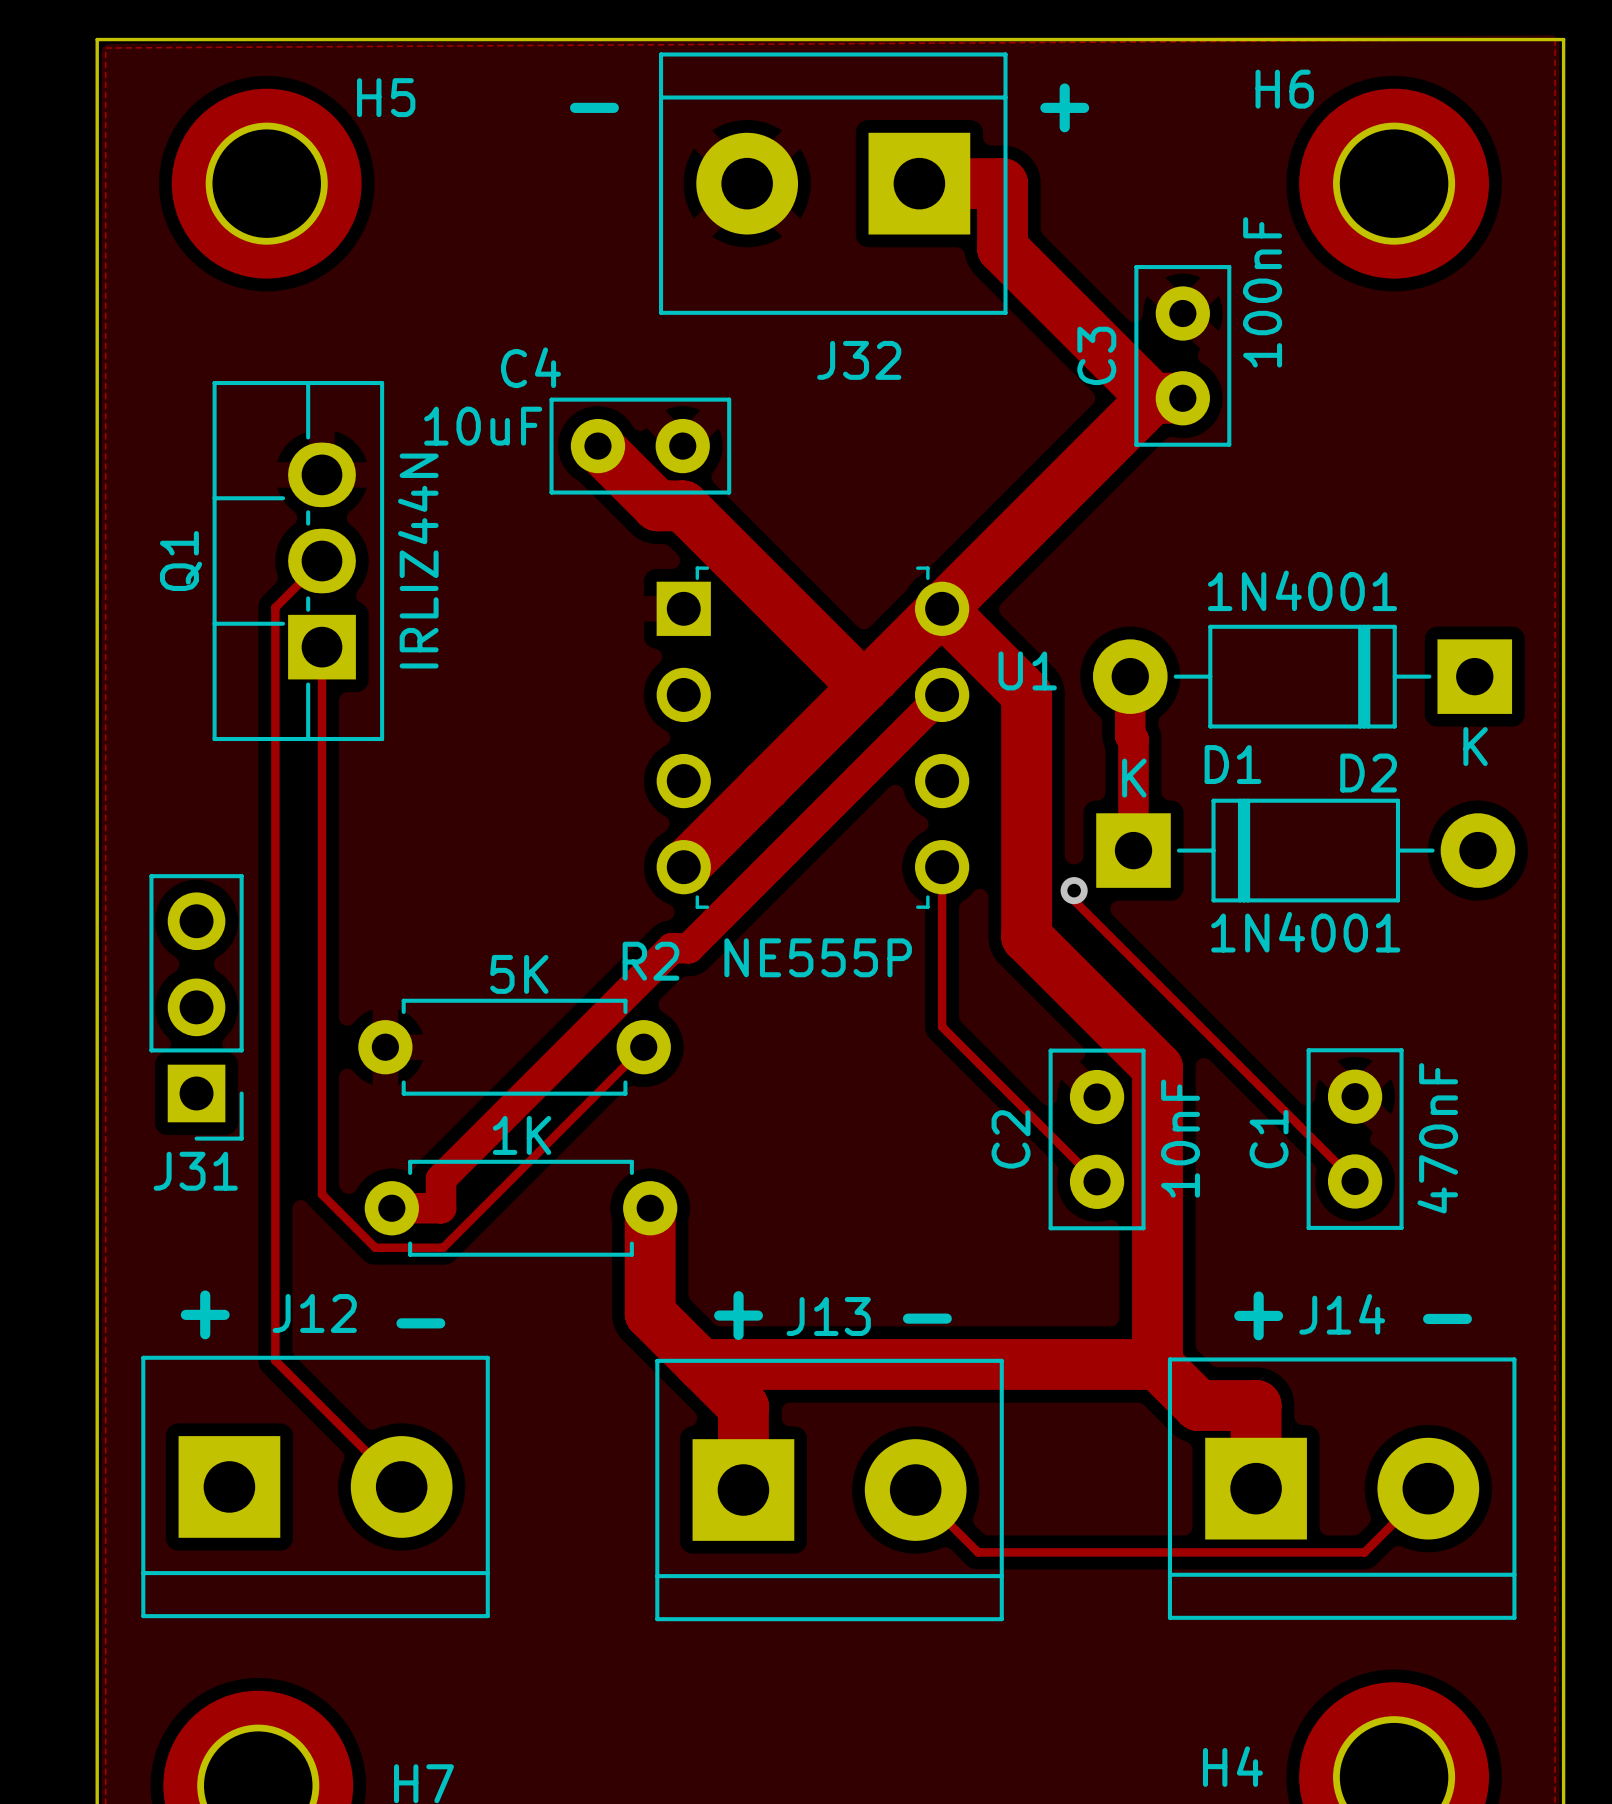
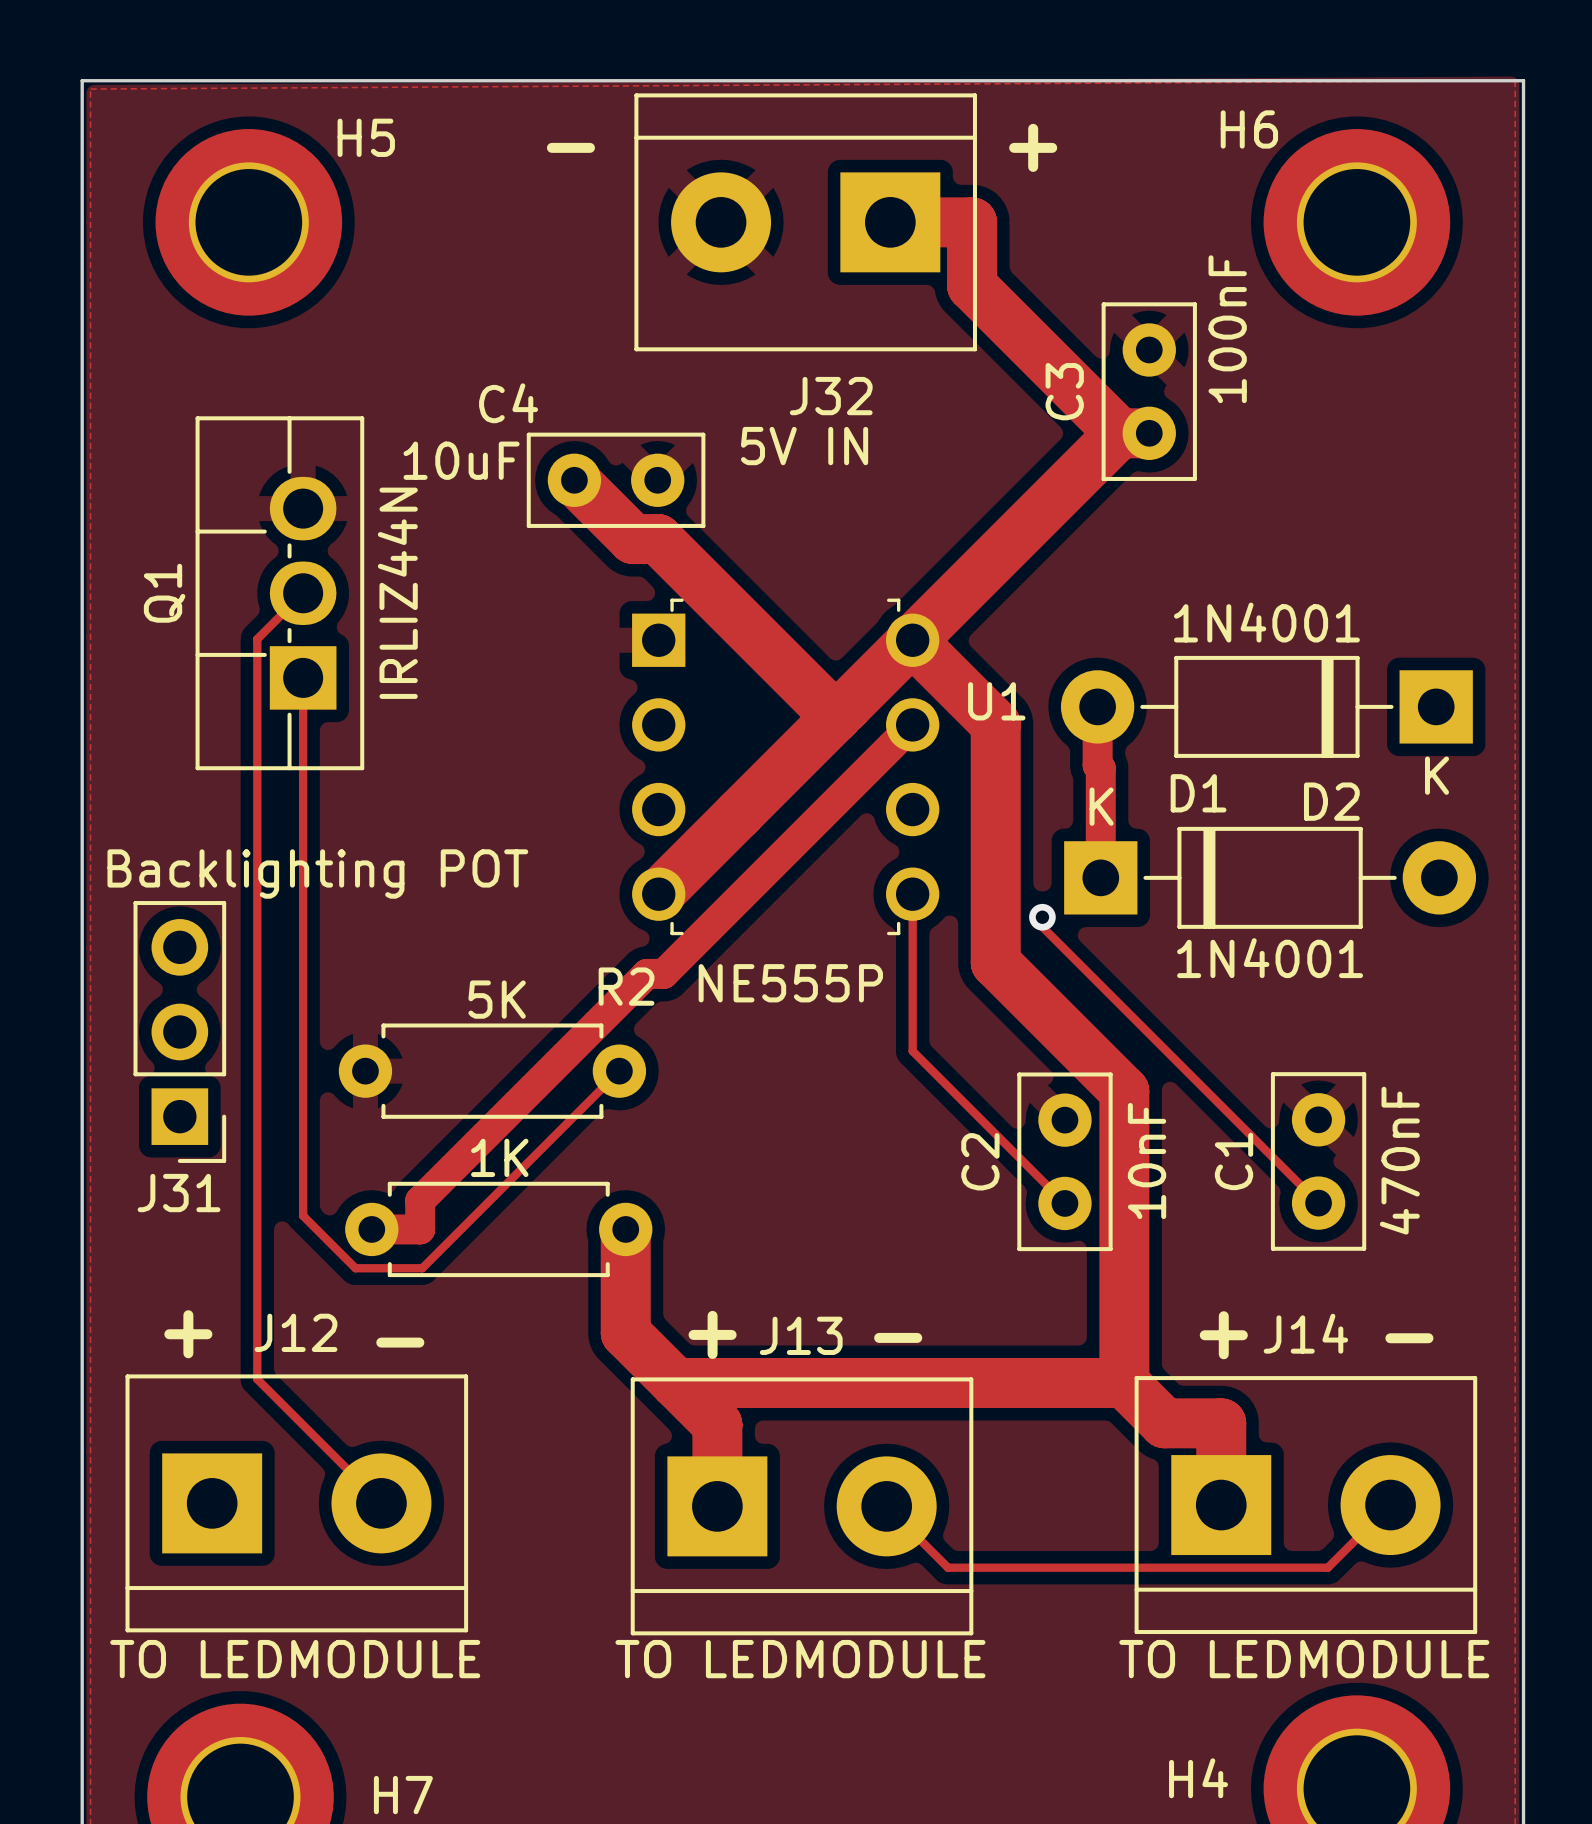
text: none -> 5V IN (804, 446)
J31 value: none -> Backlighting POT (317, 874)
text: none -> TO LEDMODULE (295, 1659)
text: none -> TO LEDMODULE (800, 1659)
text: none -> TO LEDMODULE (1304, 1659)

